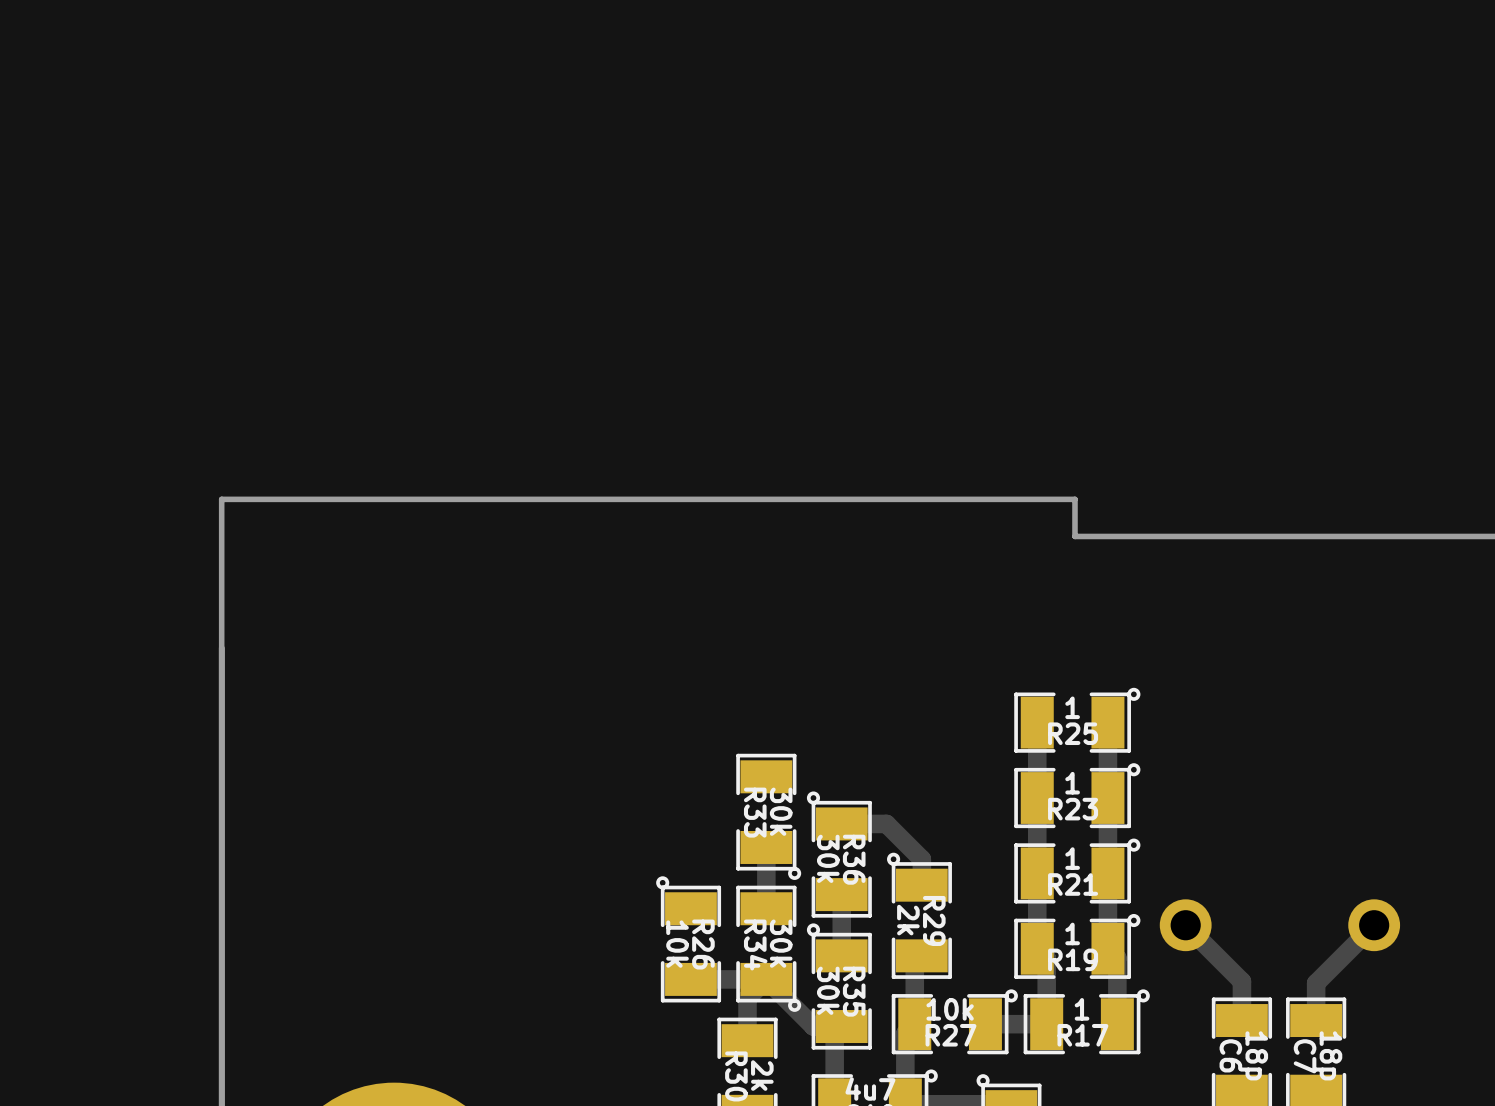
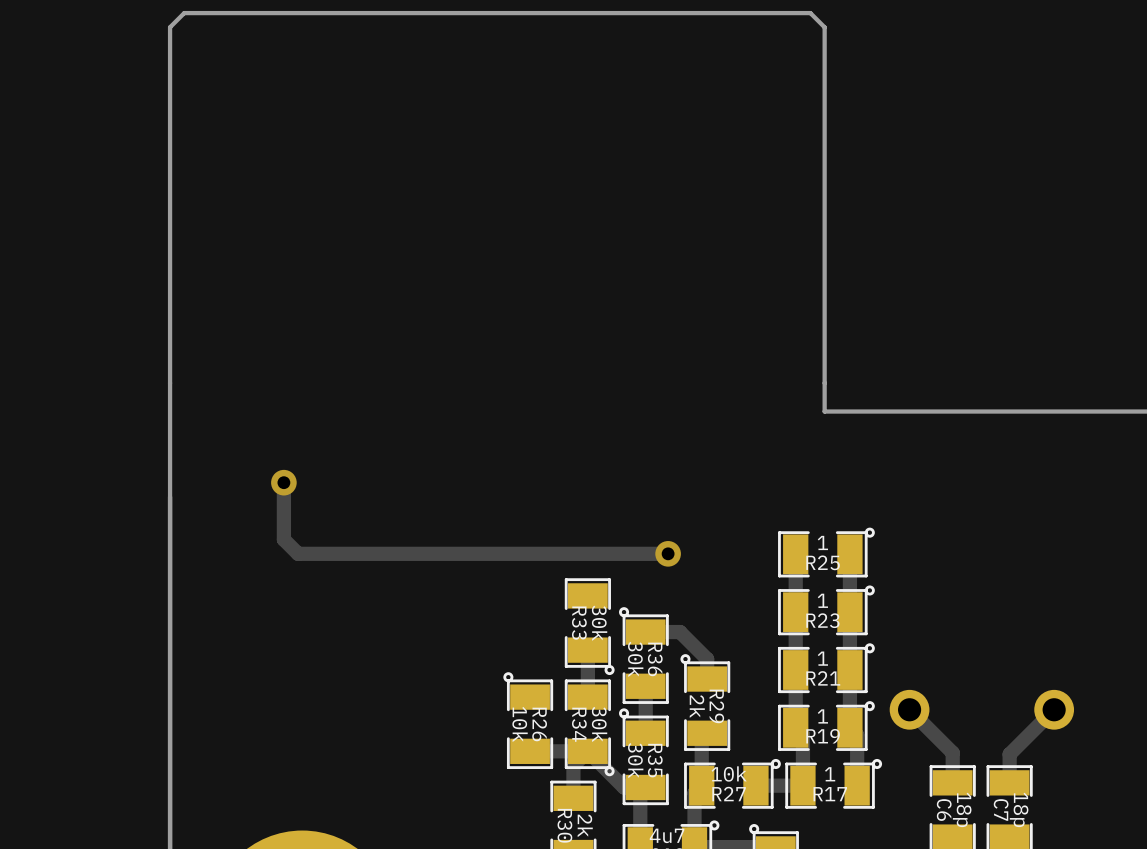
board edge: (1074, 499) (221, 499) -> (824, 383) (824, 27) (810, 13) (184, 13) (170, 27) (170, 383)
track: none -> (283, 482) (283, 539) (298, 553) (668, 553)
via: none -> (283, 482)
via: none -> (668, 553)

